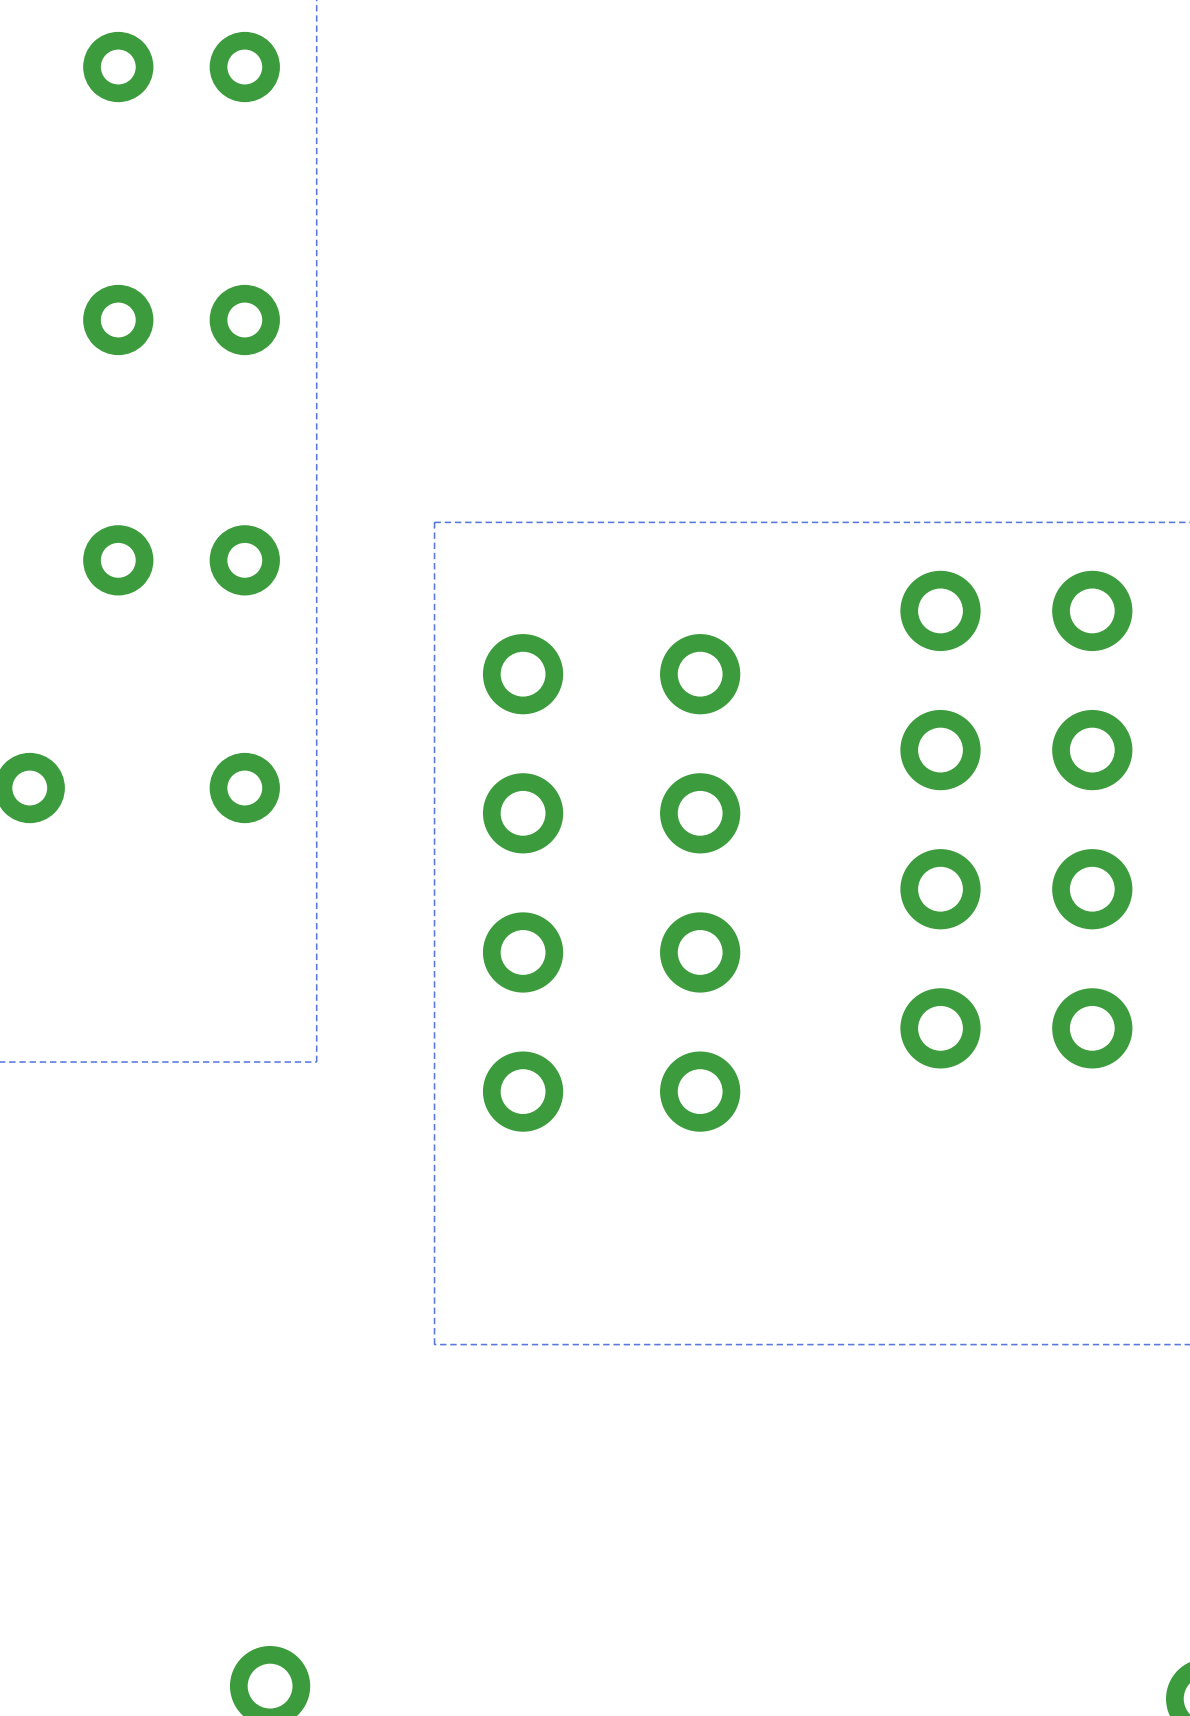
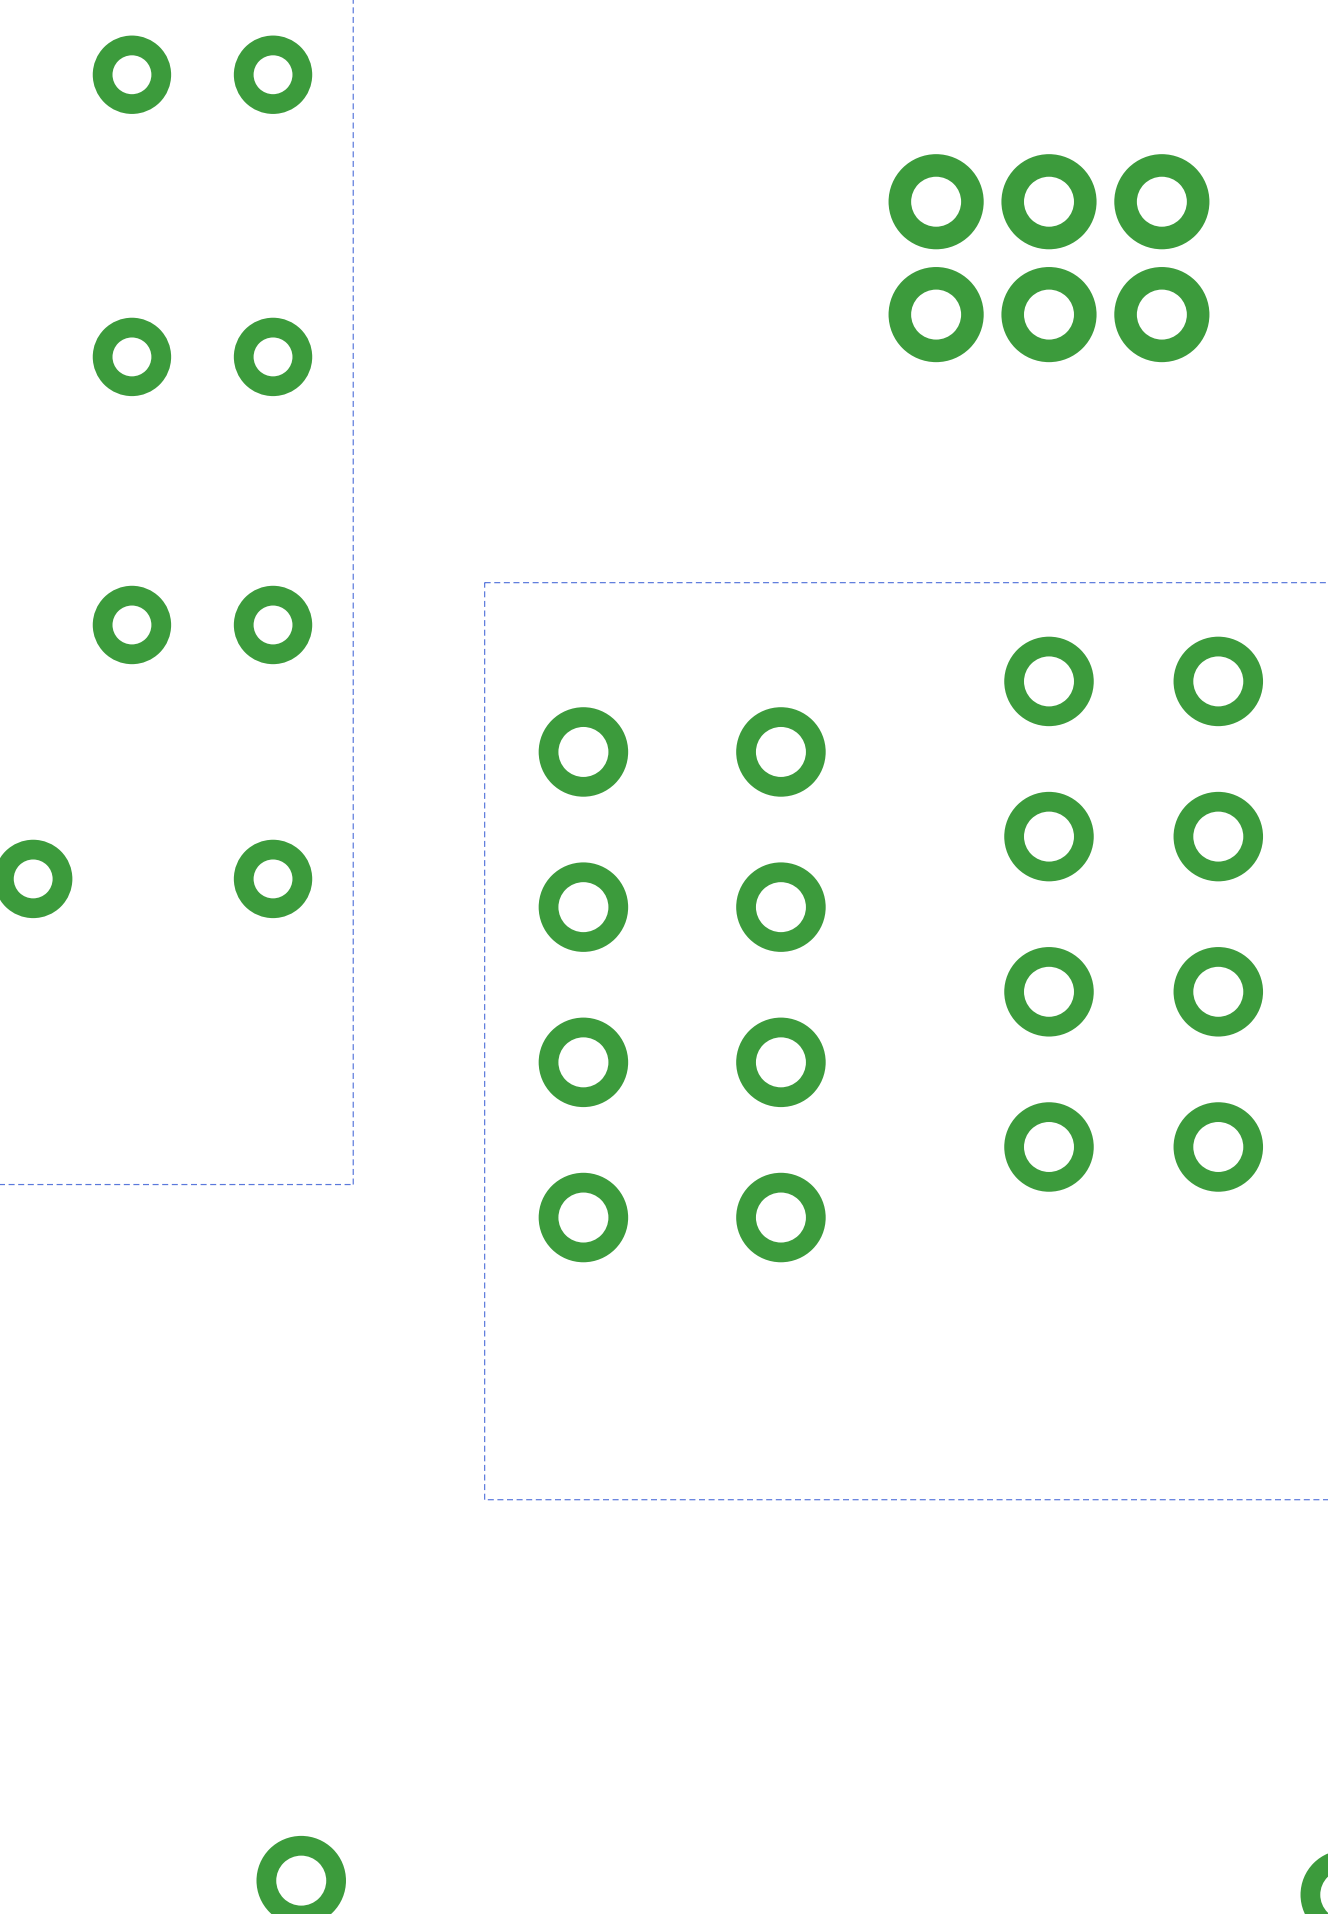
via: none -> (936, 201)
via: none -> (1048, 201)
via: none -> (1161, 201)
via: none -> (936, 314)
via: none -> (1048, 314)
via: none -> (1161, 314)

